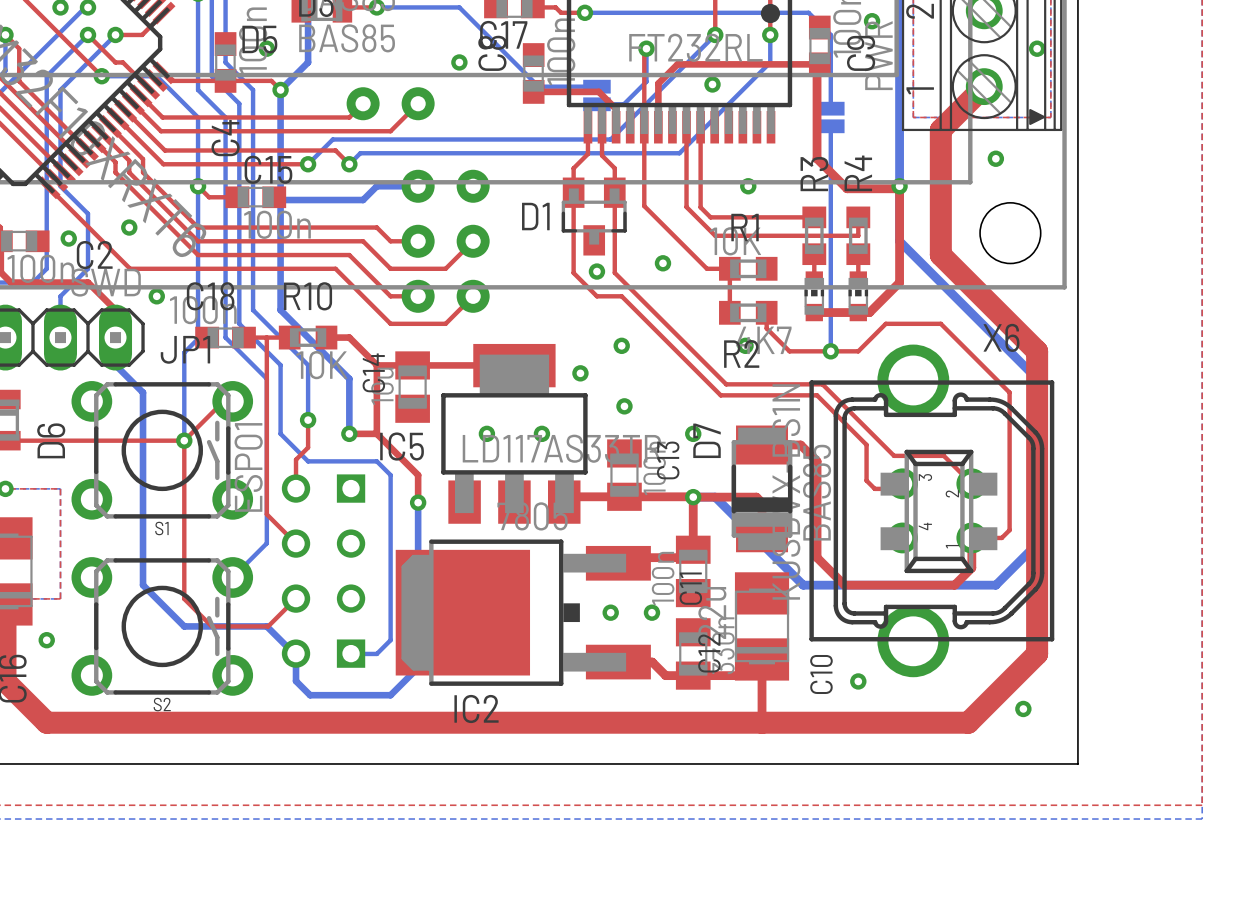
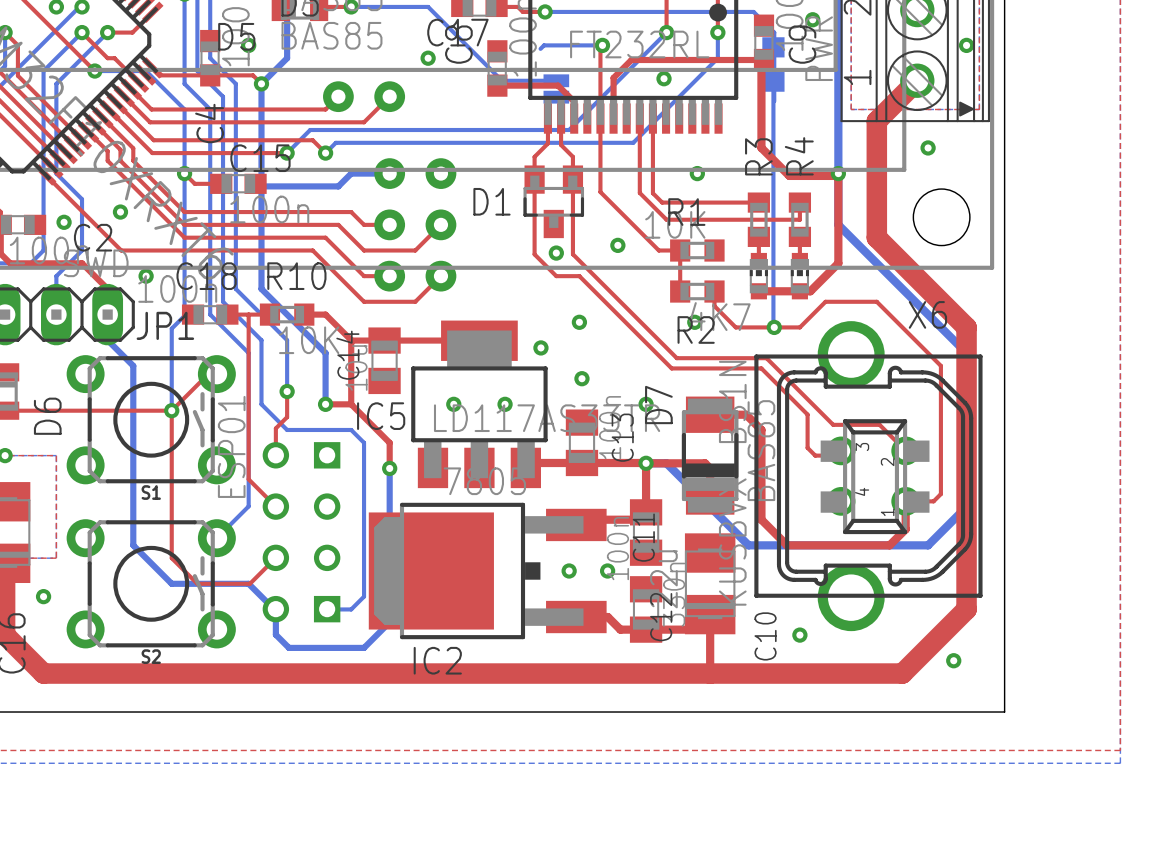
bottom track: (646, 48) (646, 81) (623, 104) (596, 104) -> (602, 45) (544, 45) (540, 48)
part: none -> (773, 64)
part: (830, 117) -> none
bottom track: (830, 126) (830, 351) -> (773, 81) (774, 327)

